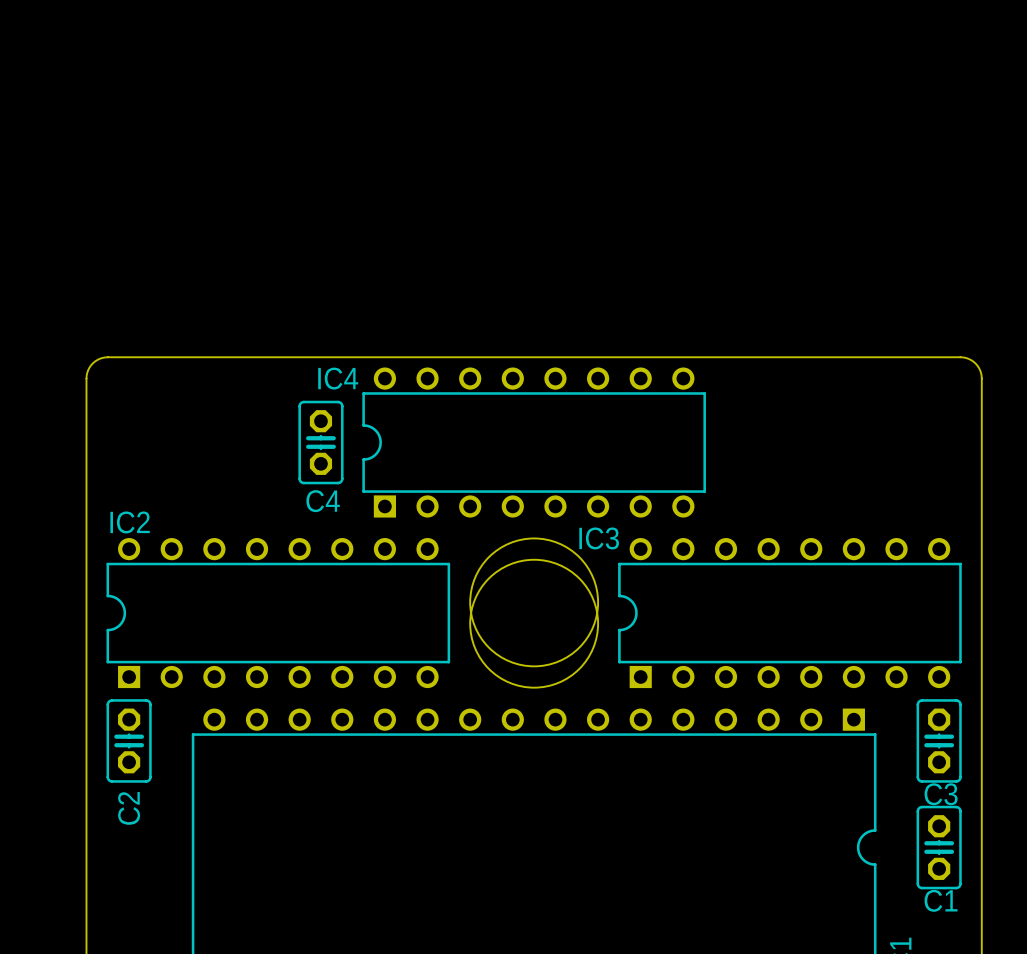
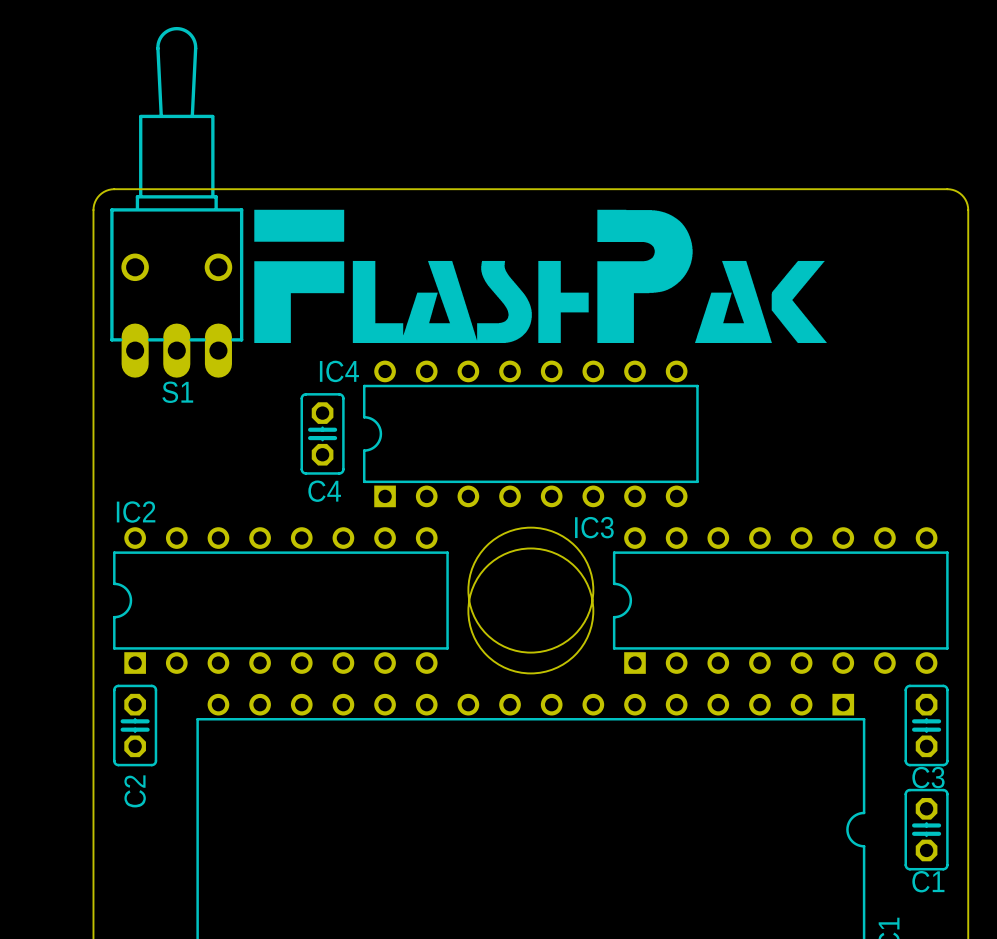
S1: none -> (176, 202)
drawing: none -> [254, 209, 693, 343]
drawing: none -> [695, 260, 827, 343]
board edge: (86, 378) (88, 370) (92, 363) (99, 358) (107, 357) (960, 357) (968, 358) (975, 363) (980, 370) (981, 378) -> (93, 371) (93, 207) (96, 199) (101, 193) (114, 189) (952, 189) (963, 197) (968, 207) (968, 371)

